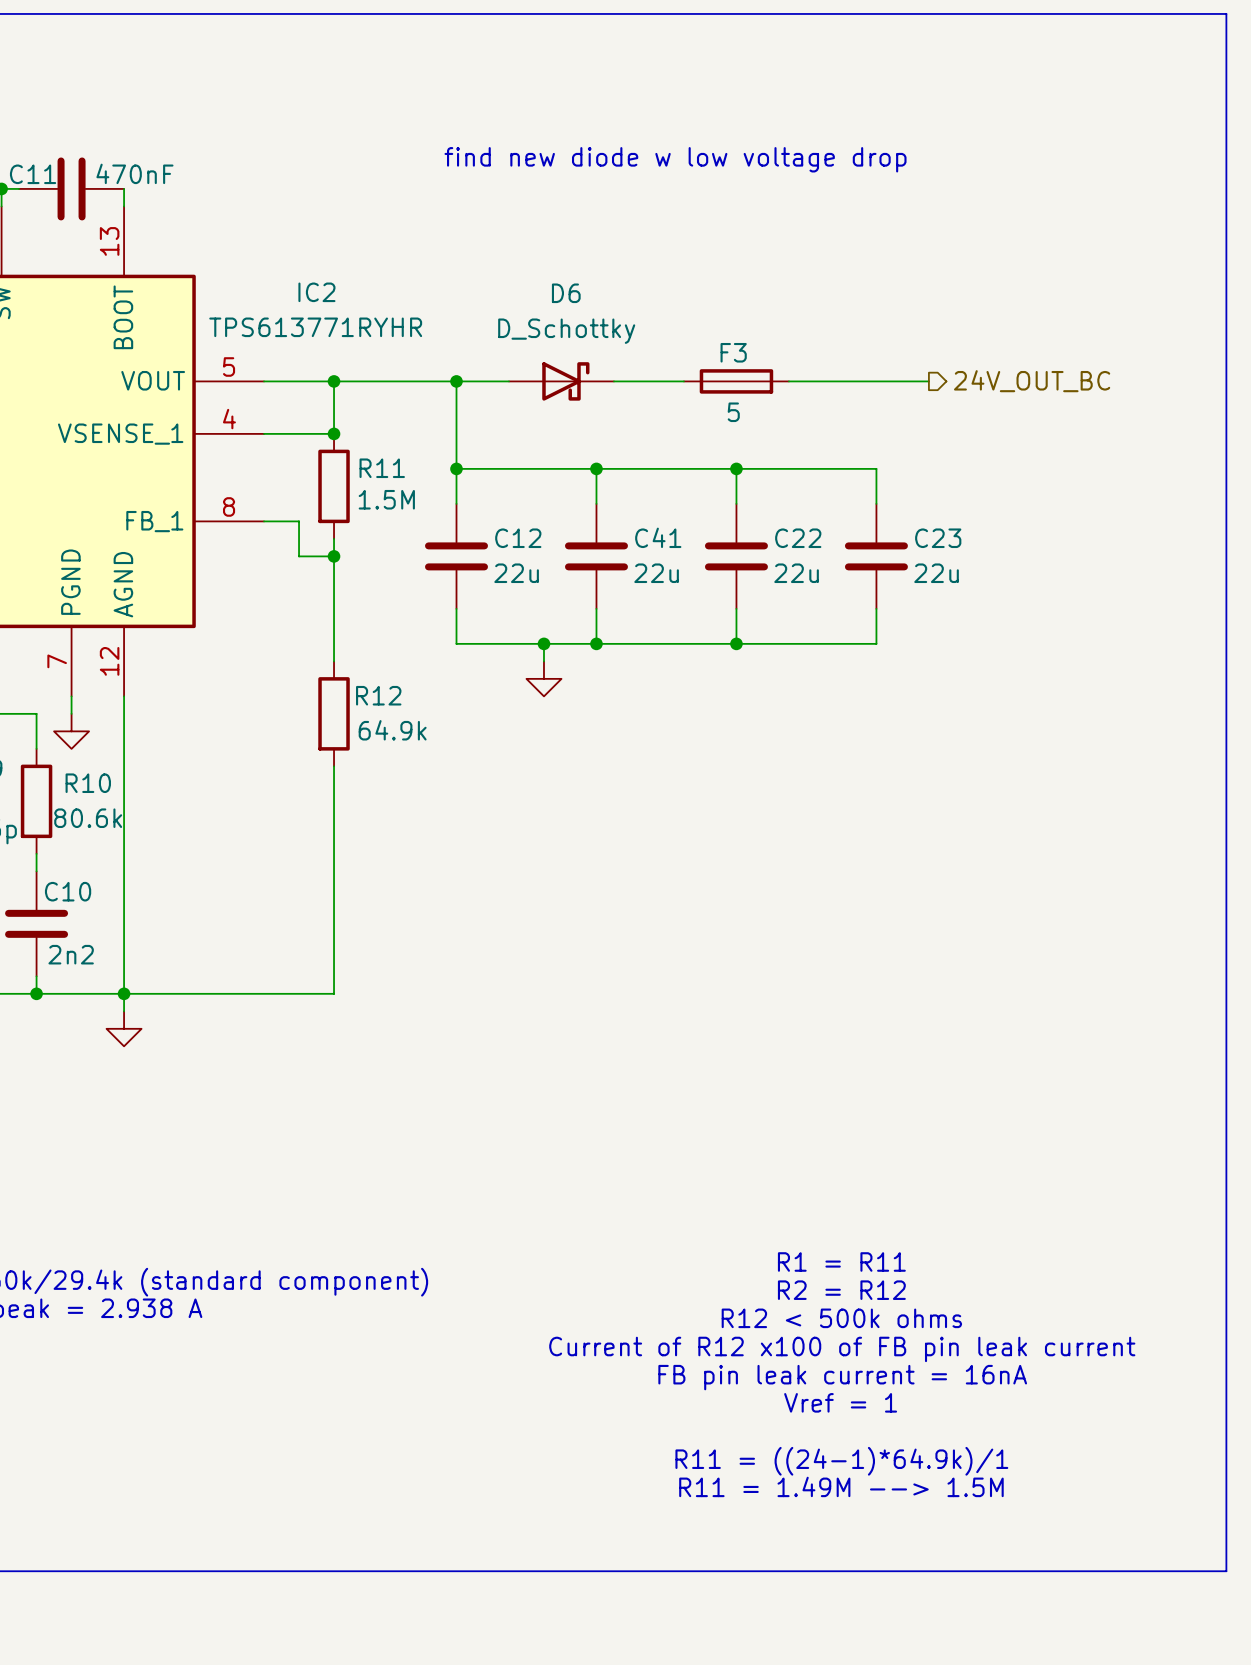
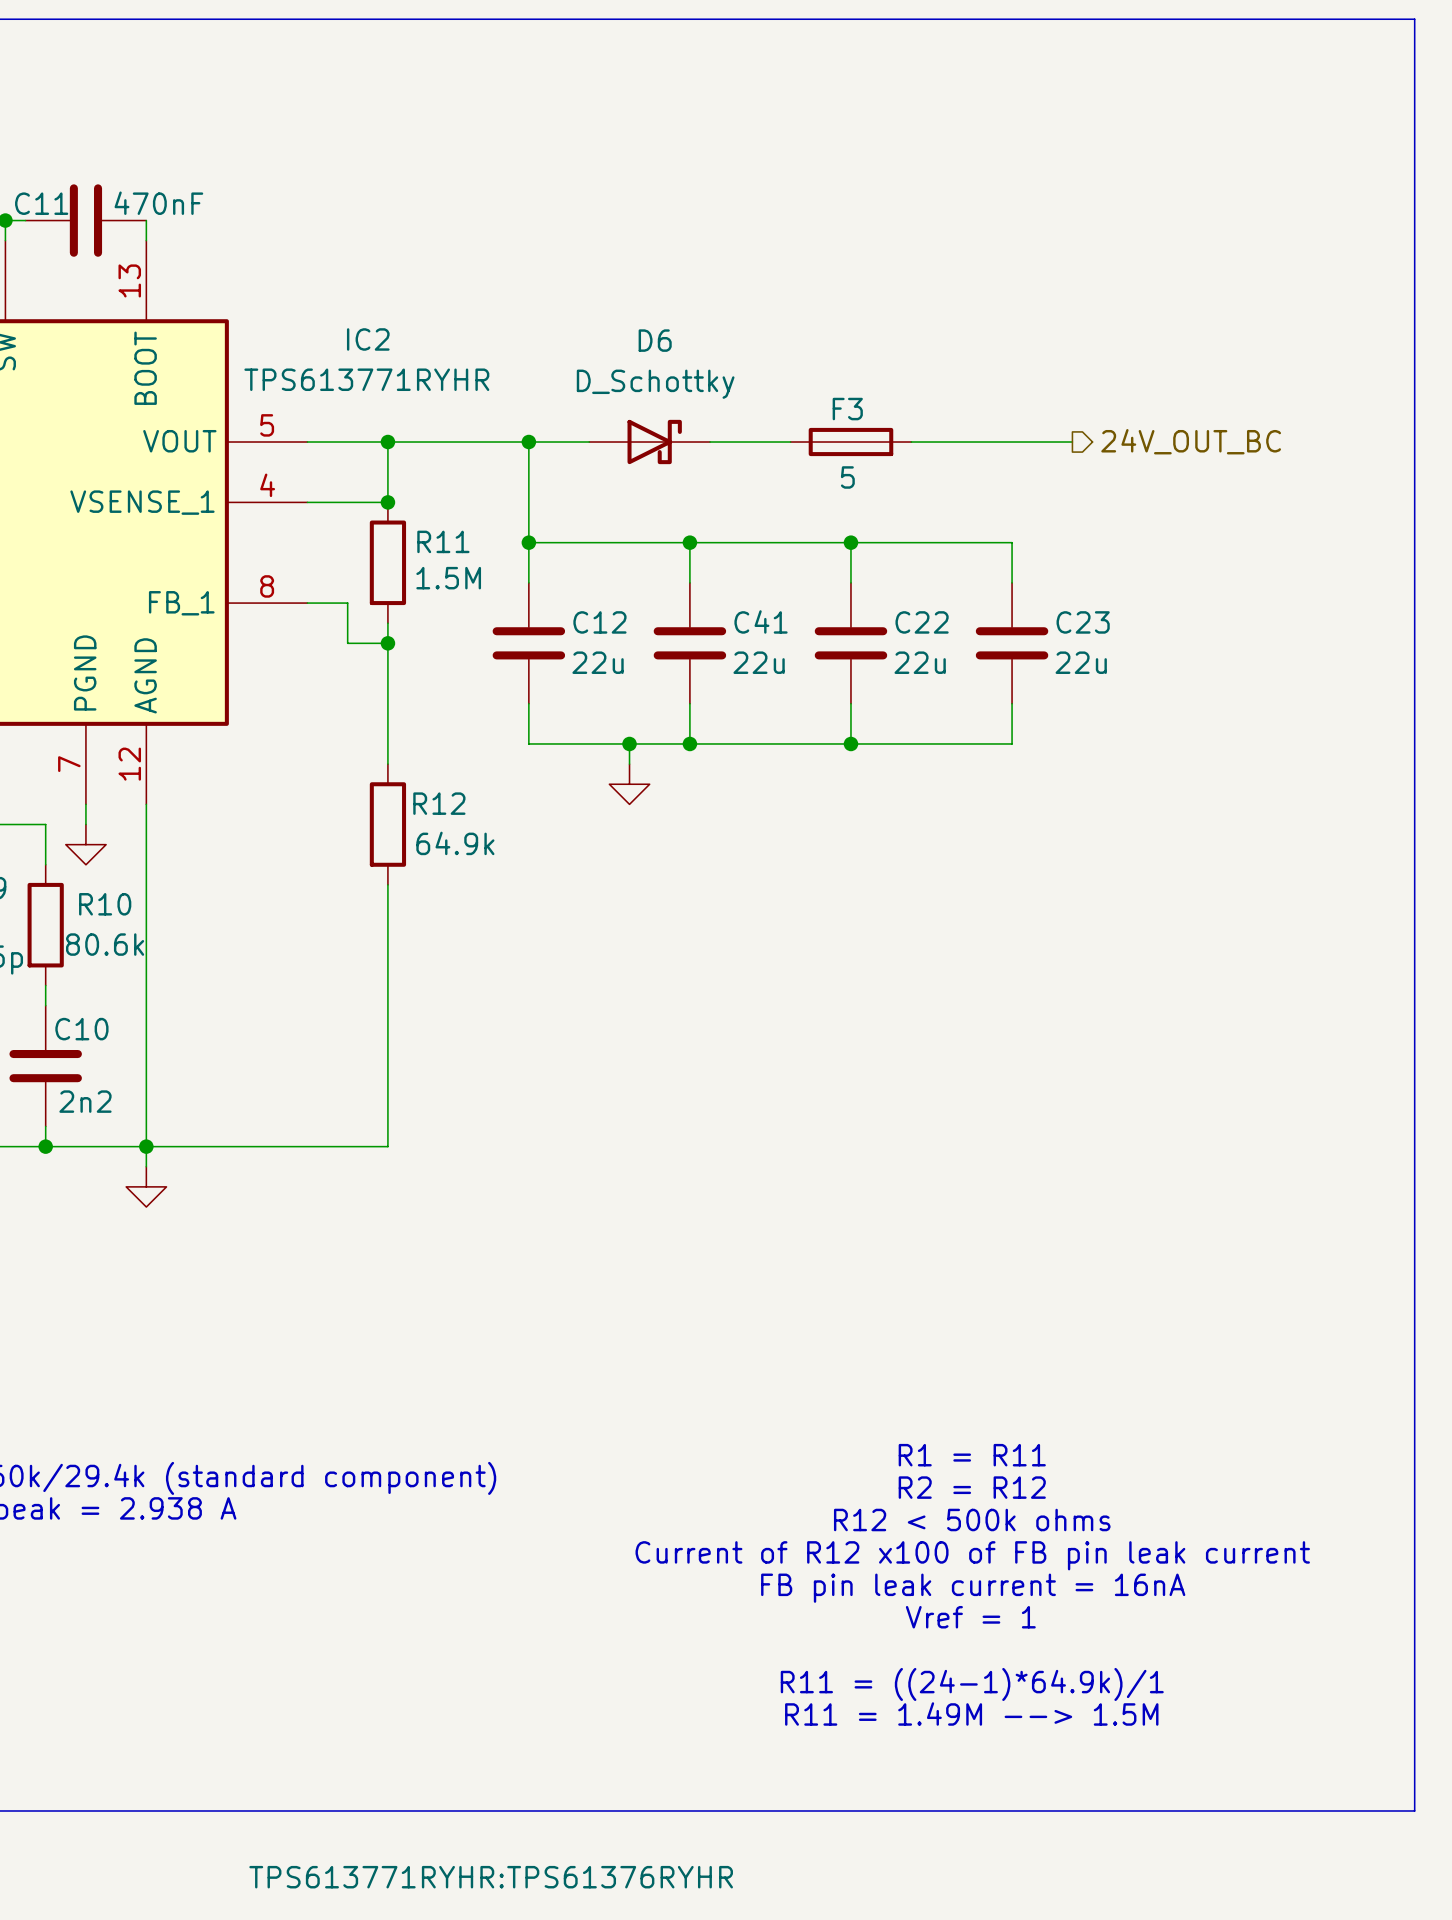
text: find new diode w low voltage drop (675, 159) -> none
IC2 text: none -> TPS613771RYHR:TPS61376RYHR (491, 1877)

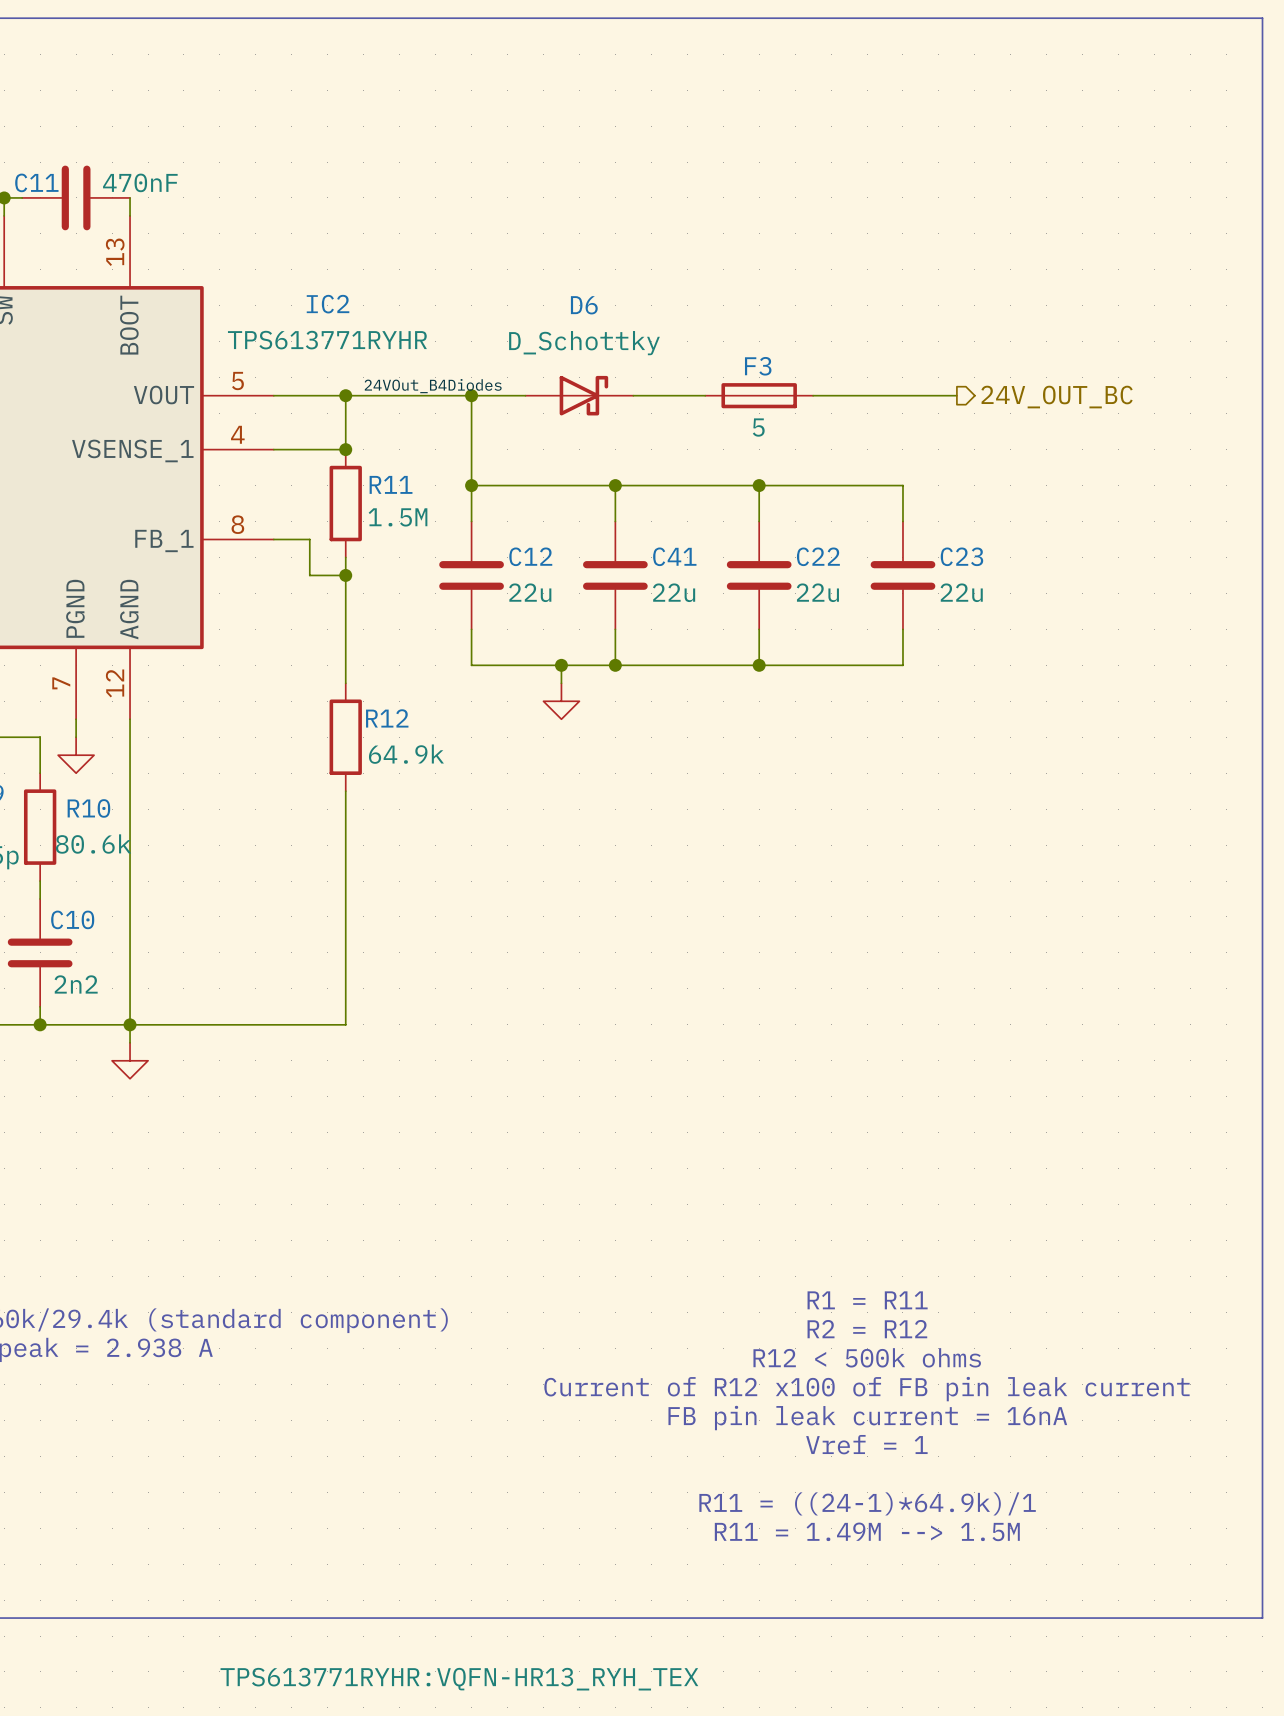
label: none -> 24VOut_B4Diodes (433, 386)
IC2 text: TPS613771RYHR:TPS61376RYHR (491, 1877) -> TPS613771RYHR:VQFN-HR13_RYH_TEX (459, 1679)

